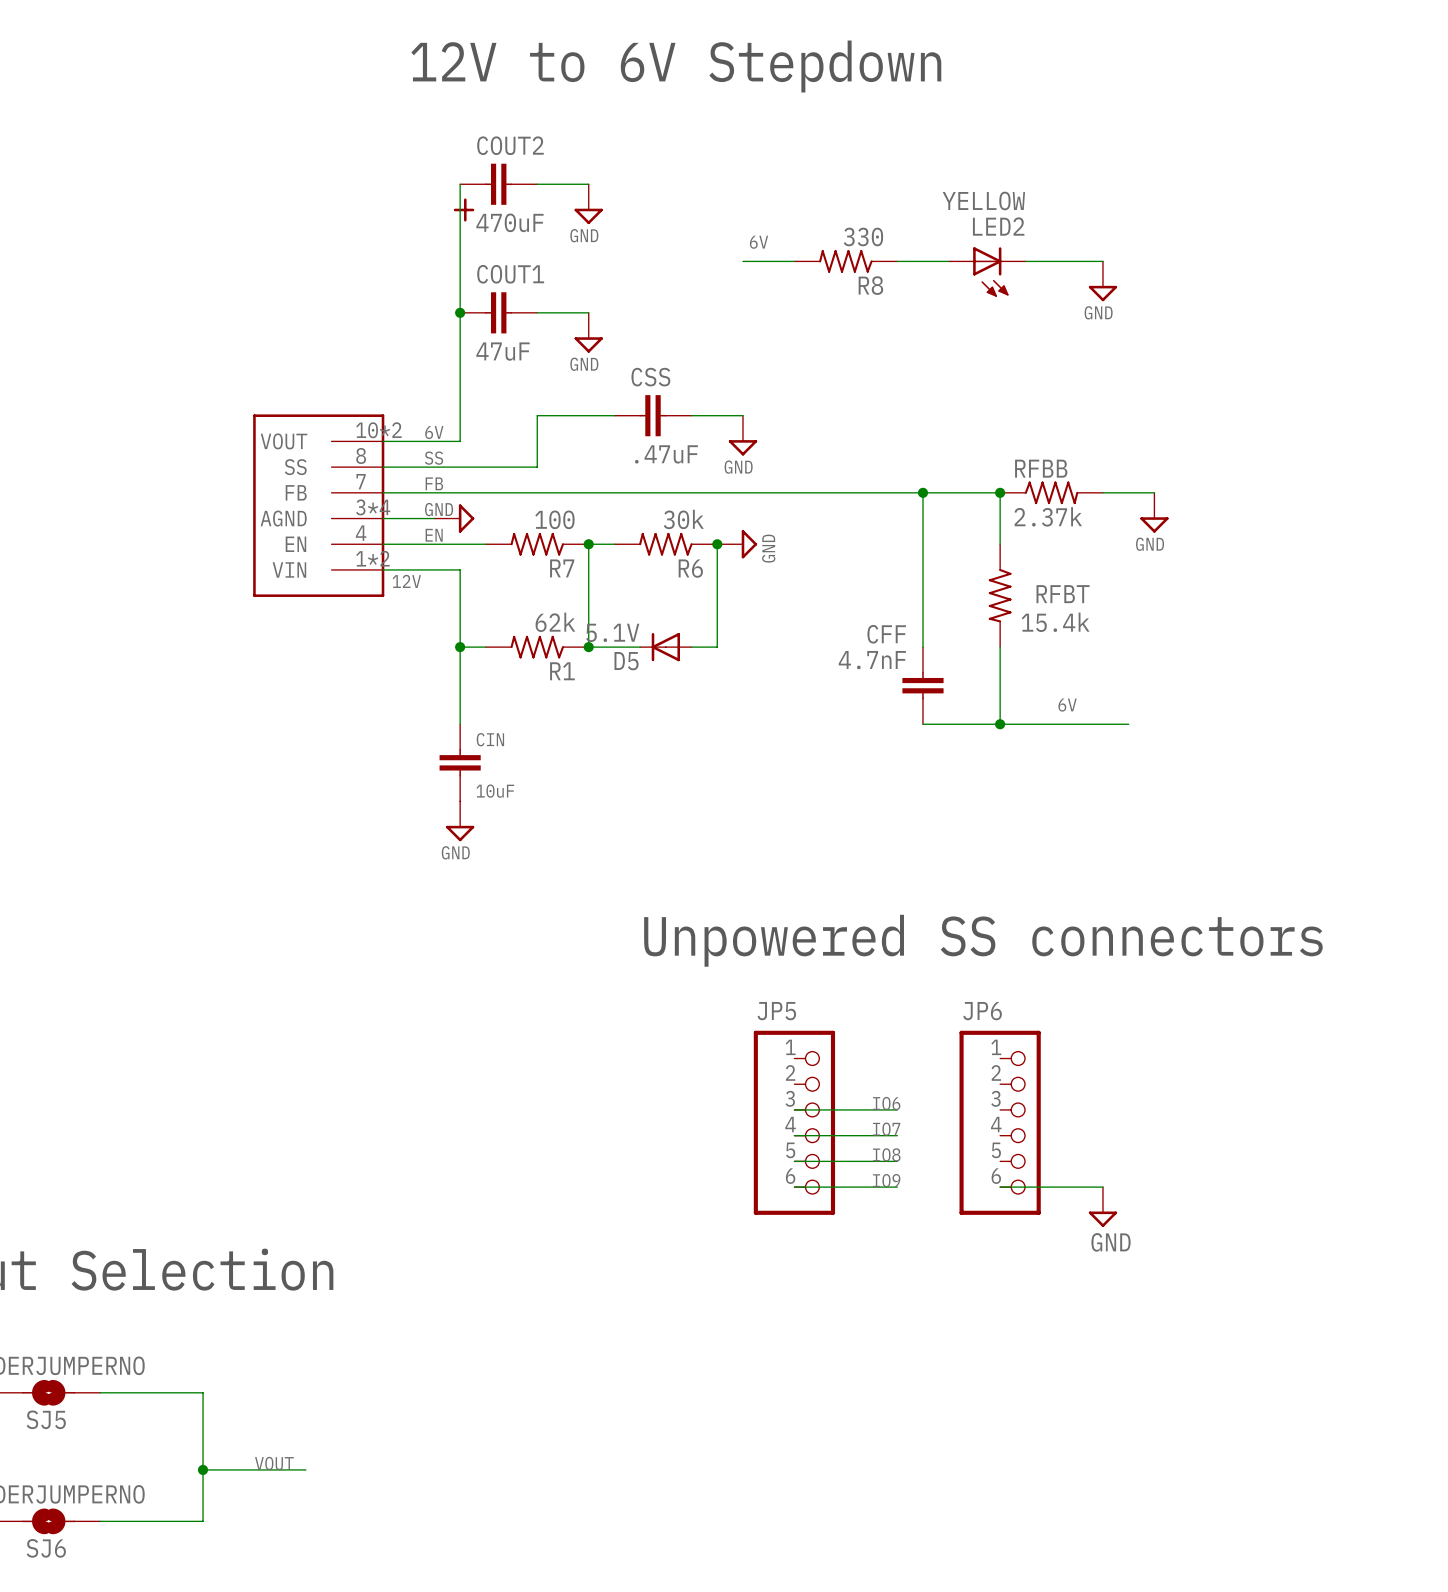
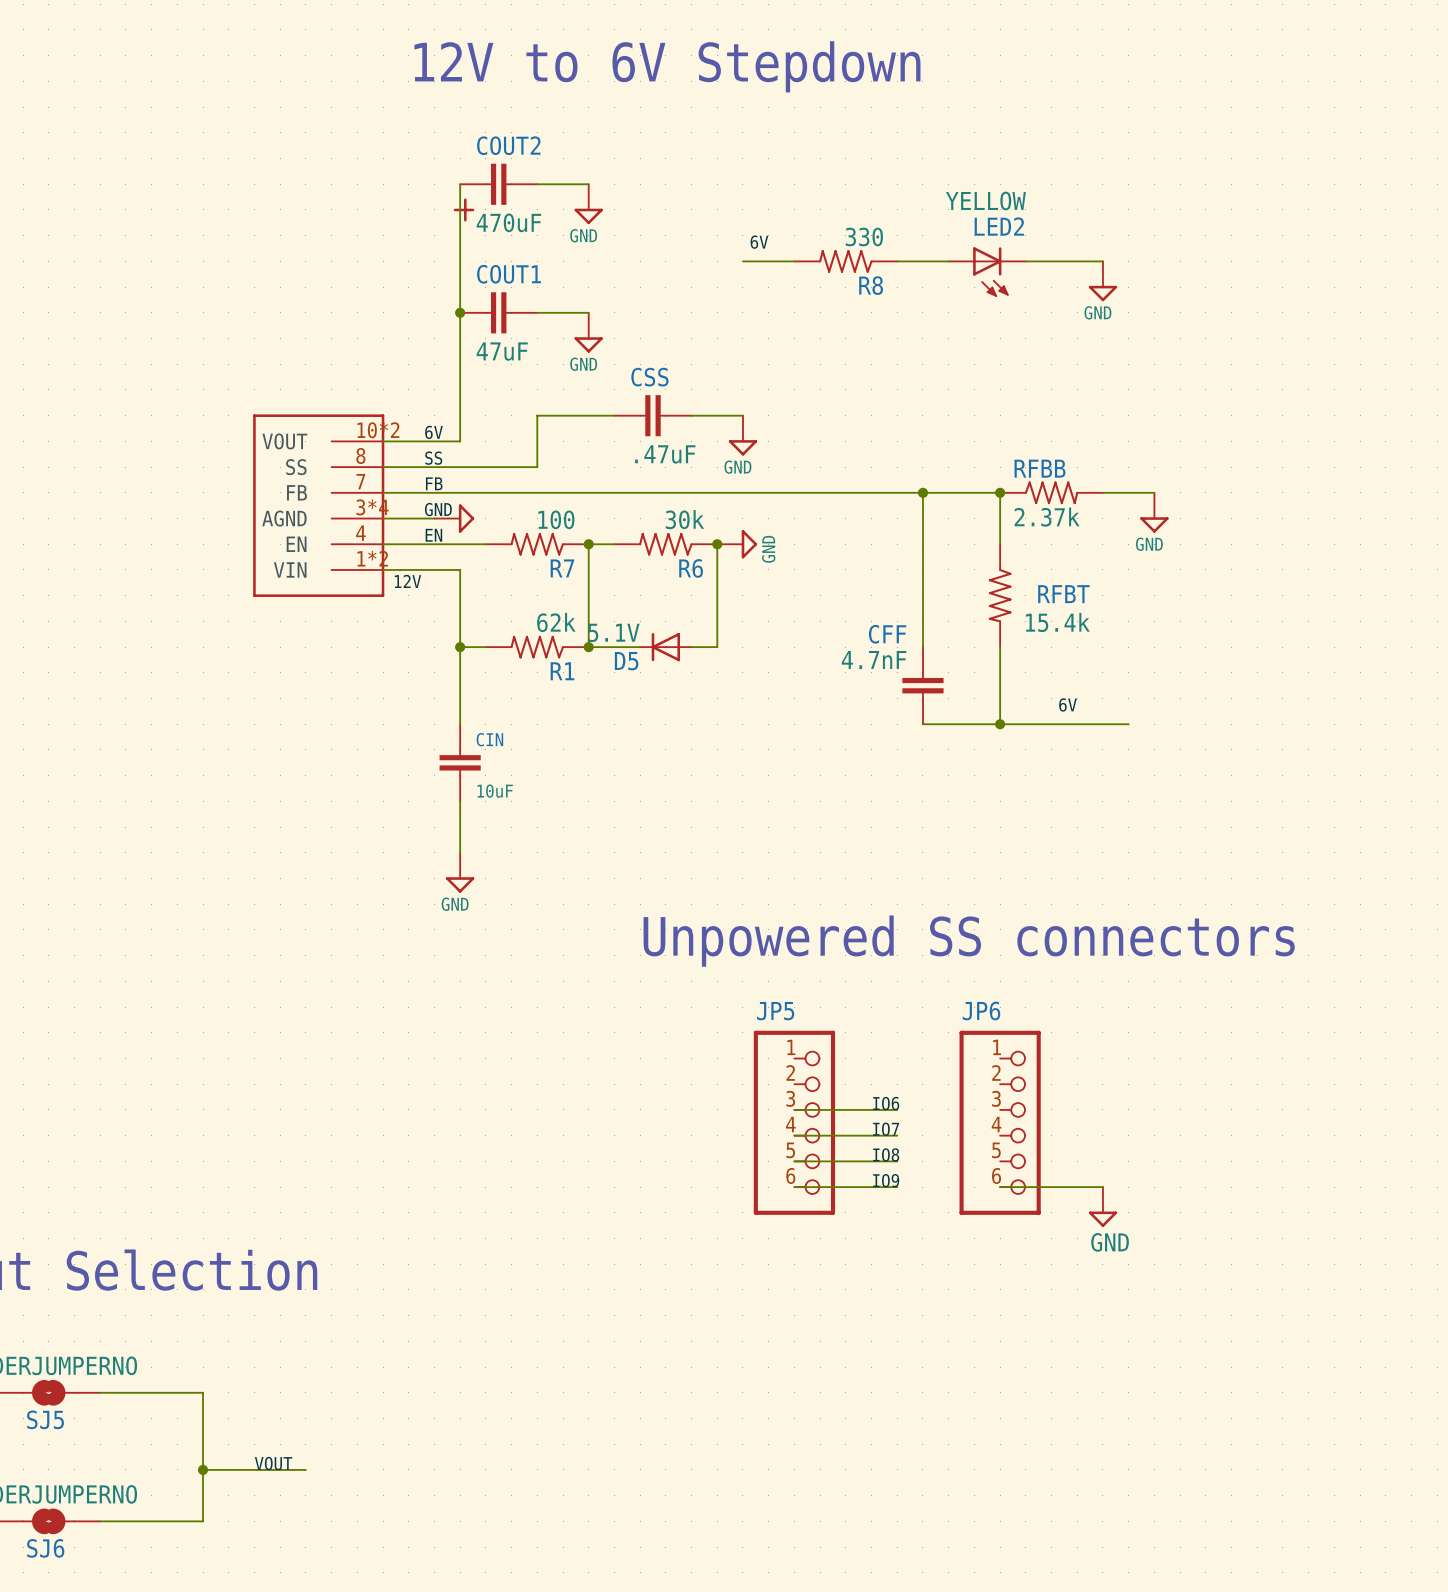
power symbol position: GND (460, 821) -> GND (460, 872)

